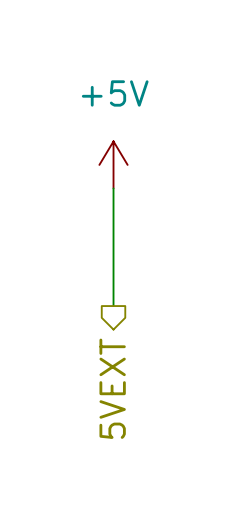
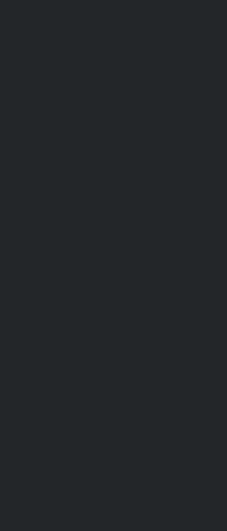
power symbol: +5V (113, 164) -> none
wire: (113, 188) (113, 306) -> none
hierarchical label: 5VEXT (112, 388) -> none

